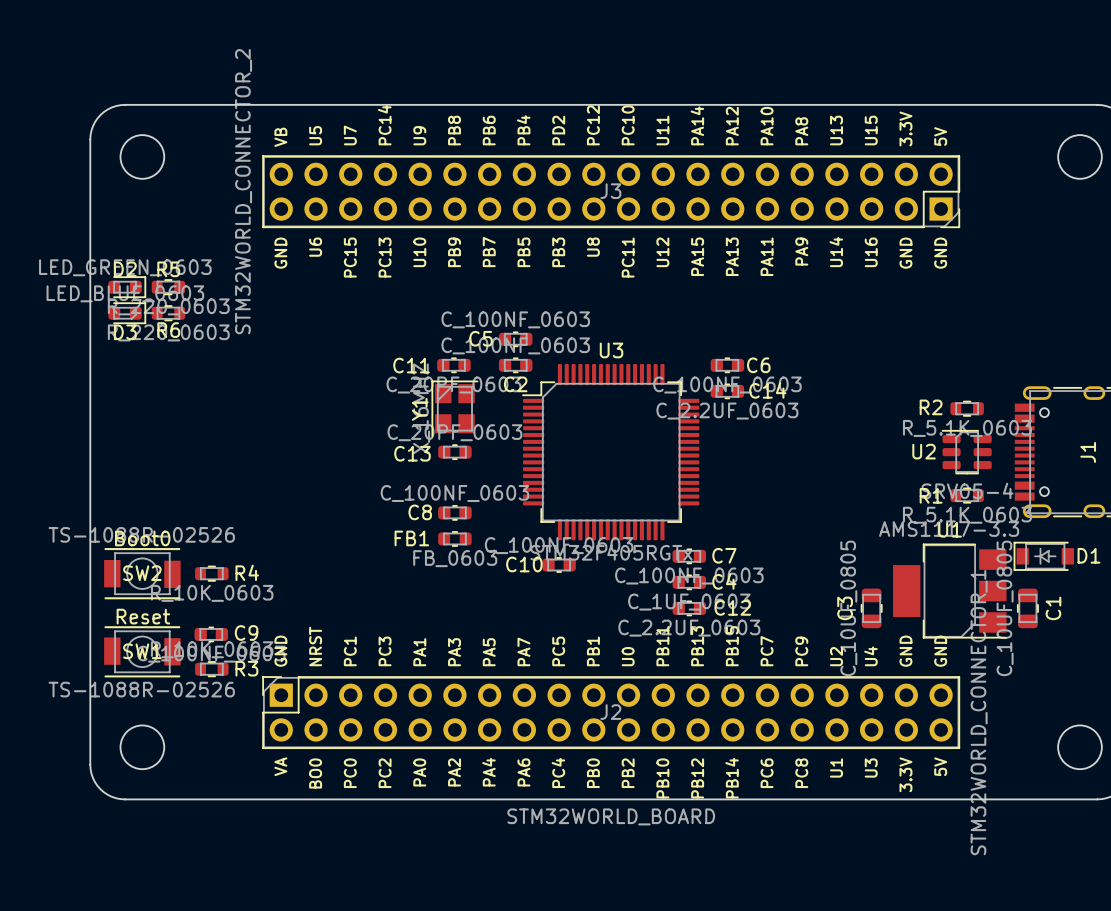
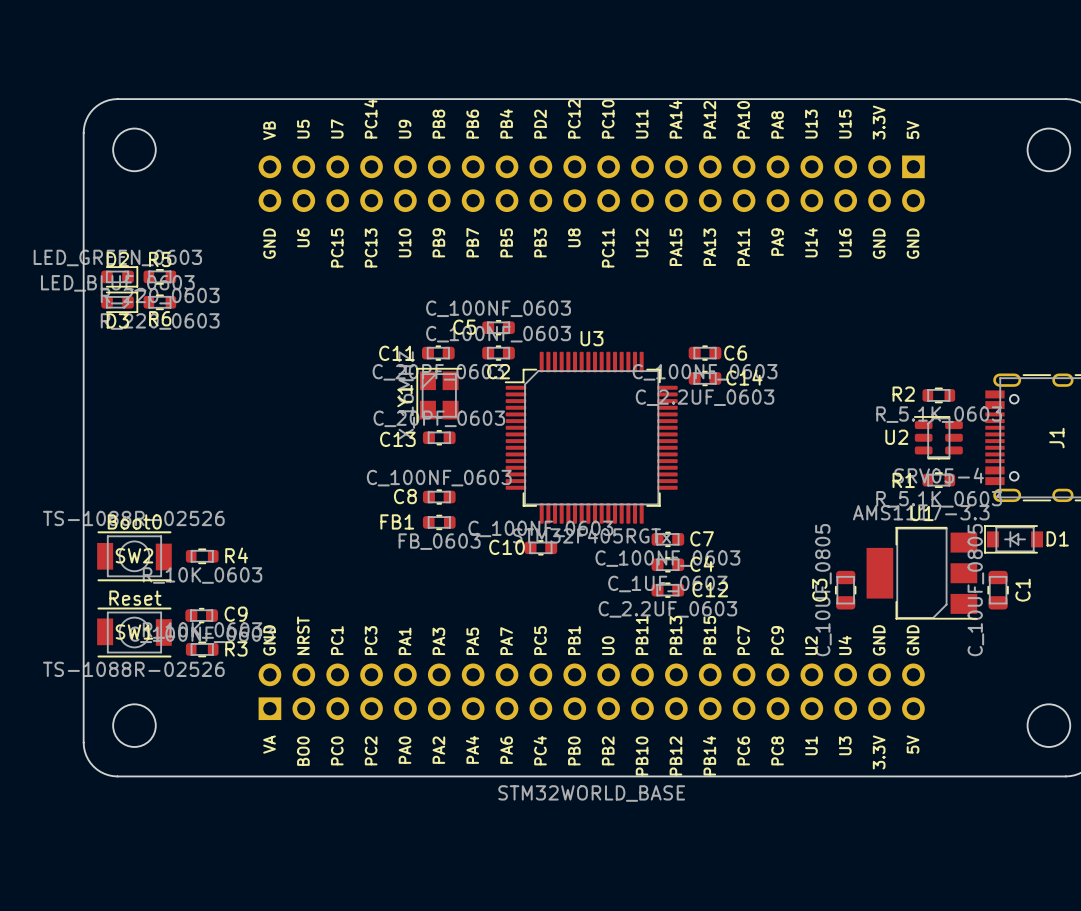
part footprint: [120, 135, 1102, 770] -> [113, 128, 1071, 747]
J3: STM32WORLD_CONNECTOR_2 (611, 191) -> none
J2: STM32WORLD_CONNECTOR_1 (611, 712) -> none
part value: STM32WORLD_BOARD (611, 816) -> STM32WORLD_BASE (591, 793)

